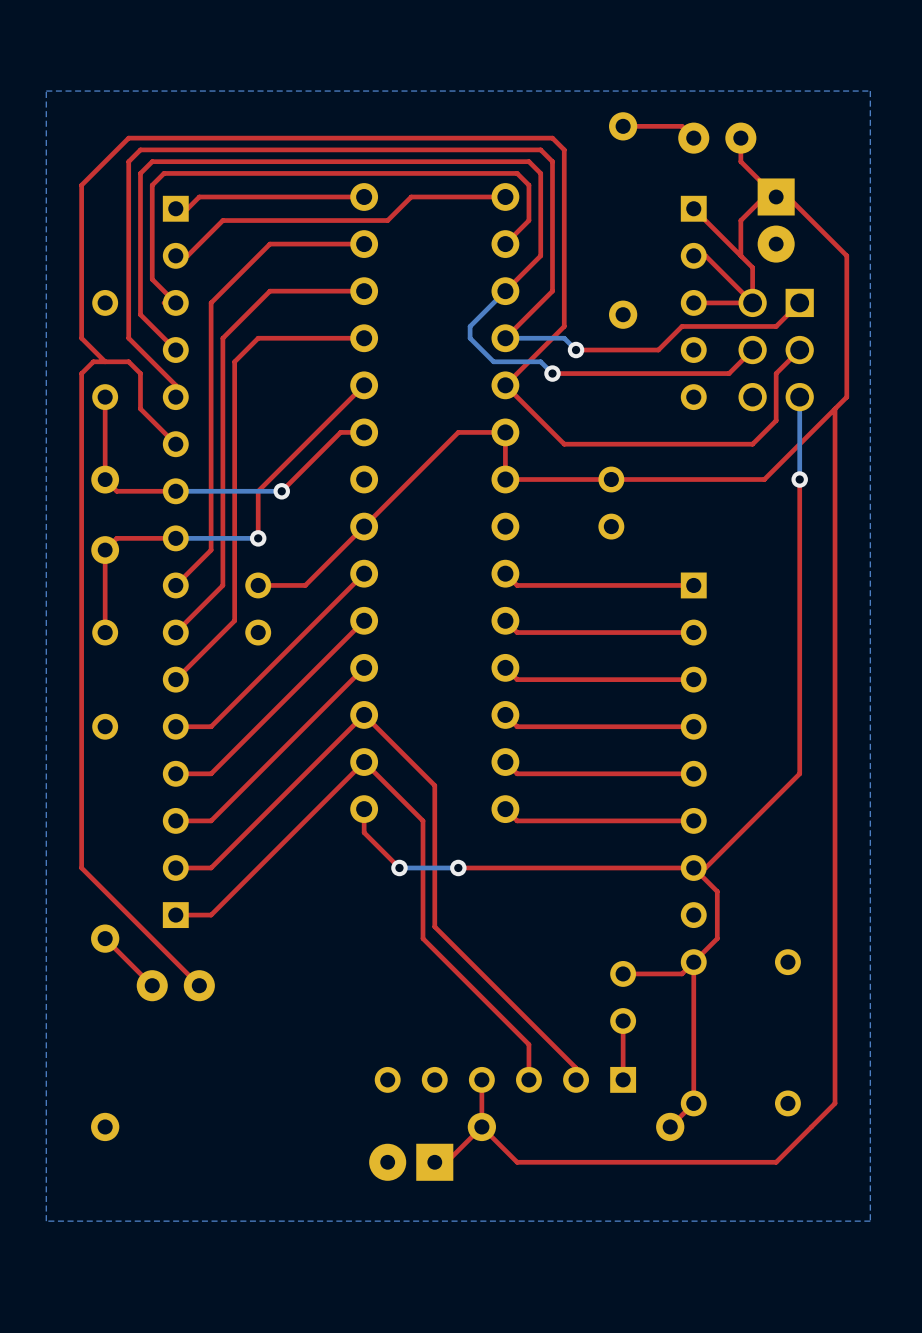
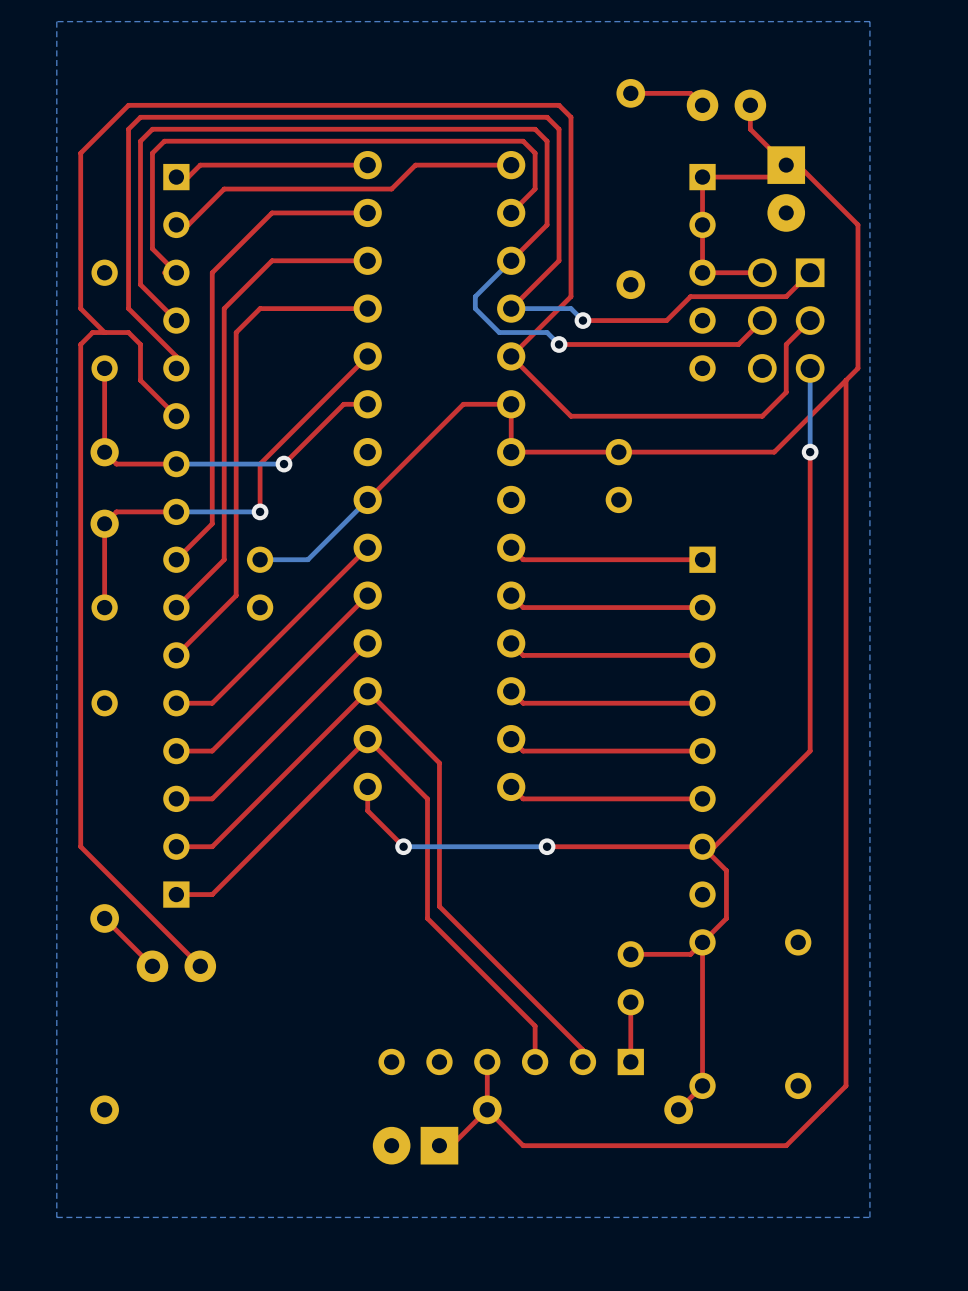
bottom zone outline: (870, 91) (870, 1221) (46, 1221) (46, 91) (870, 91) -> (869, 21) (869, 1217) (56, 1217) (56, 21) (869, 21)
top track: (776, 196) (764, 196) (740, 220) (740, 255) -> (786, 165) (774, 177) (702, 177) (702, 272)
top track: (693, 208) (752, 267) (752, 302) (705, 255) (693, 255) -> none
top track: (364, 526) (305, 585) (258, 585) -> none
bottom track: none -> (367, 499) (307, 559) (260, 559)
via position: (458, 867) -> (547, 846)
top track: (540, 867) (458, 867) -> none
bottom track: none -> (547, 846) (463, 846)

